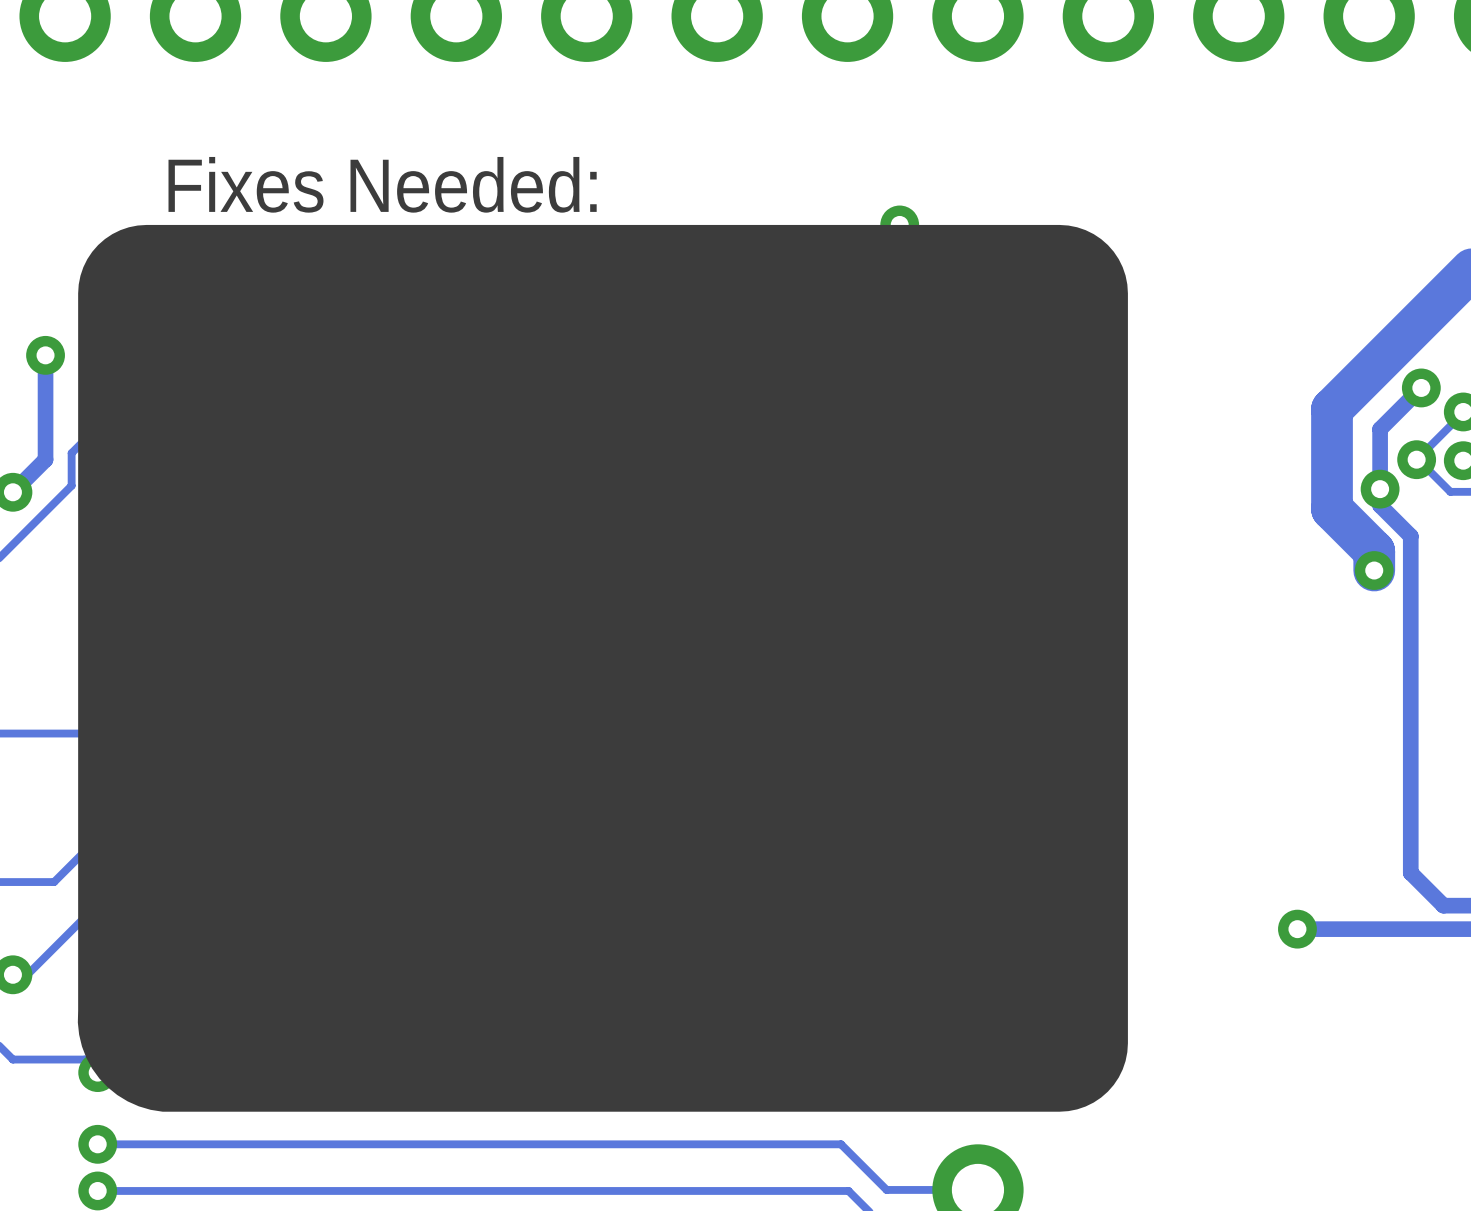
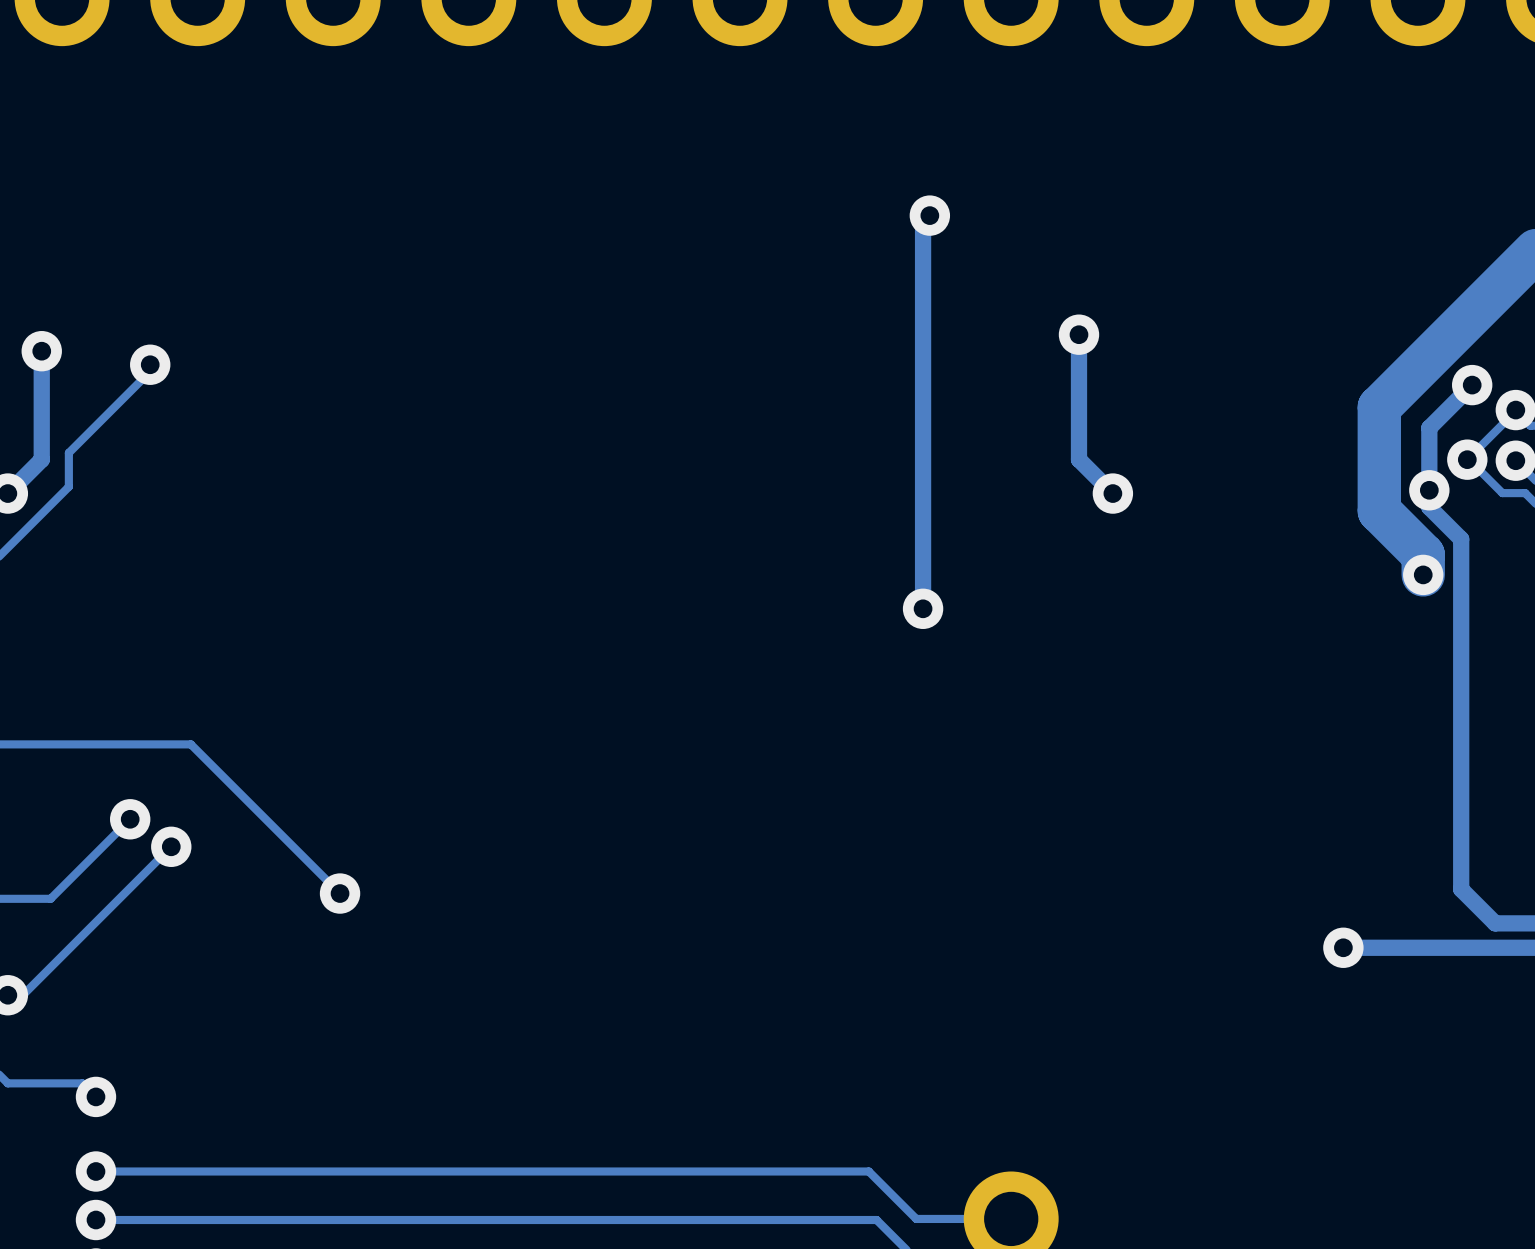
text: Fixes Needed: (382, 184) -> none
drawing: [77, 224, 1128, 1112] -> none

